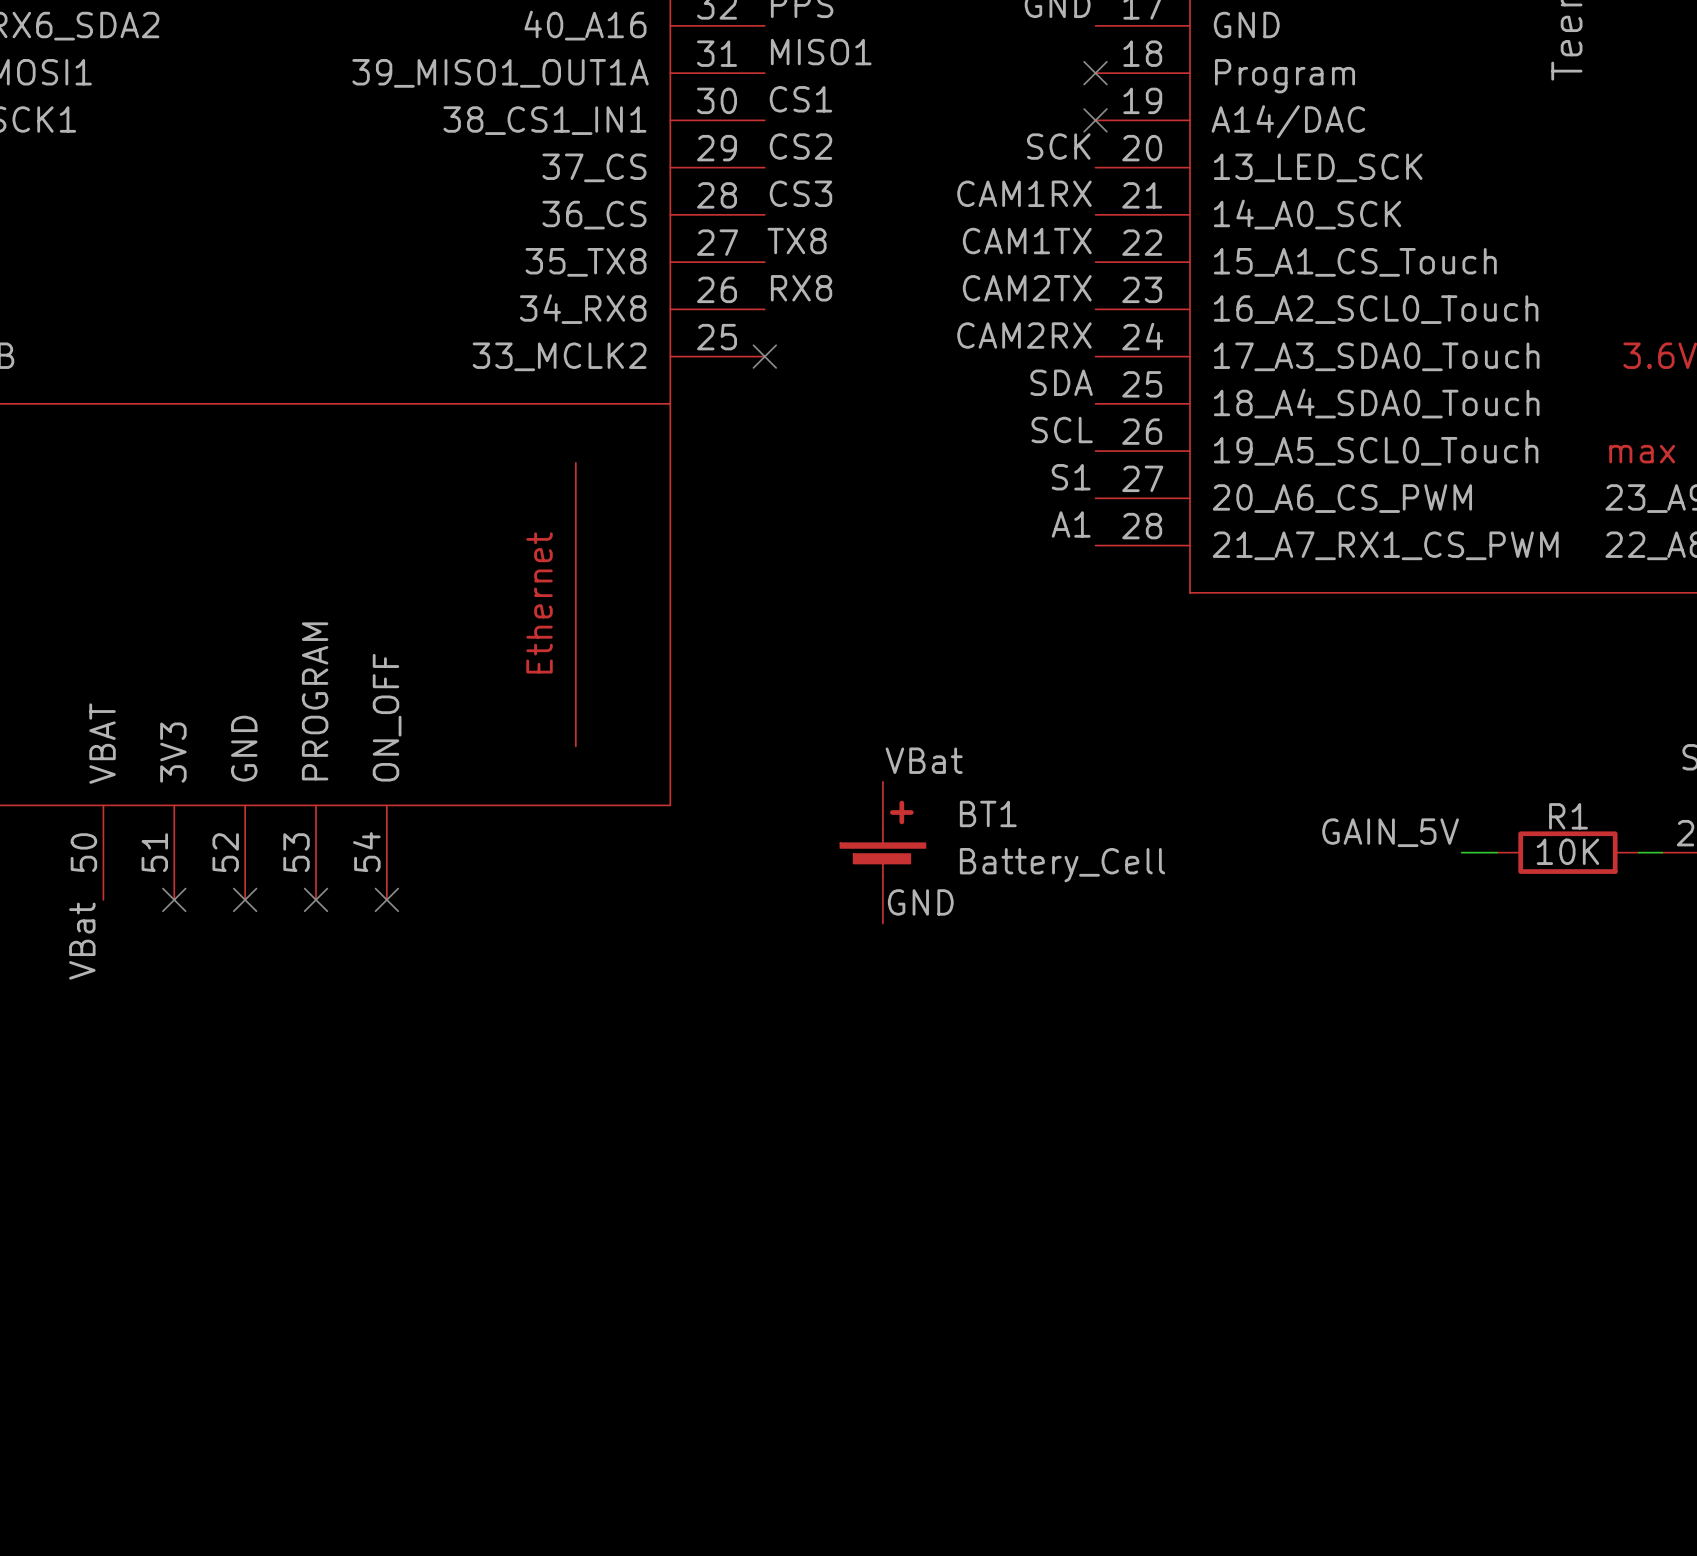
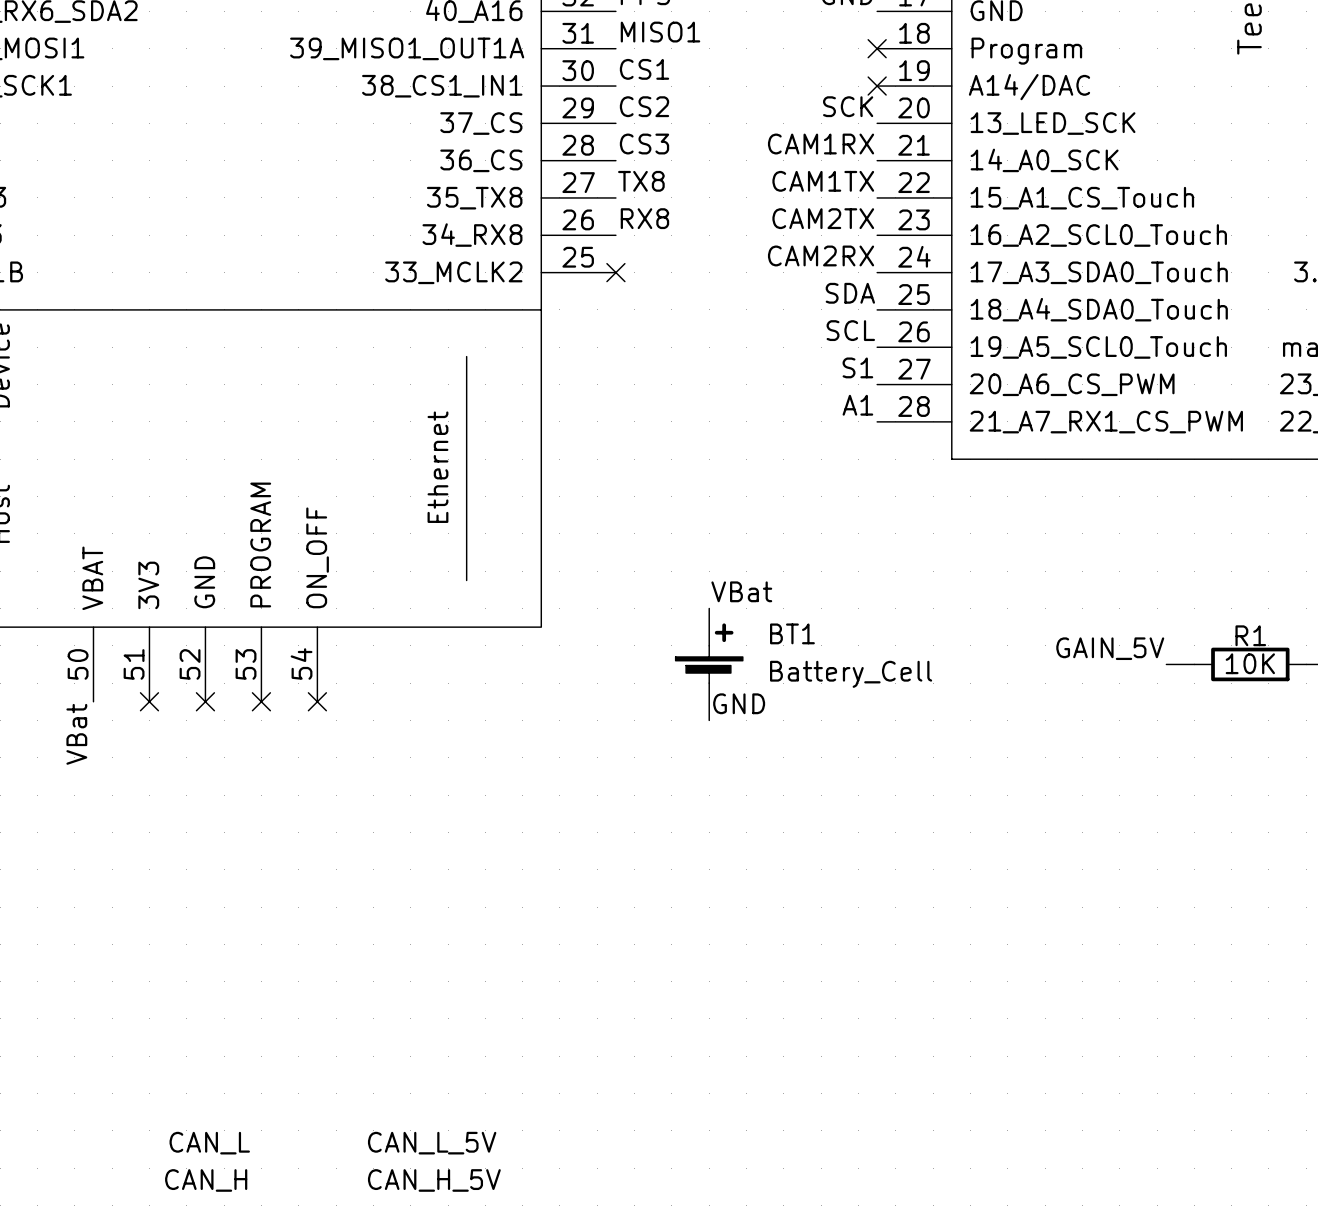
label: none -> CAN_L (209, 1143)
label: none -> CAN_L_5V (432, 1143)
label: none -> CAN_H (206, 1180)
label: none -> CAN_H_5V (434, 1180)

